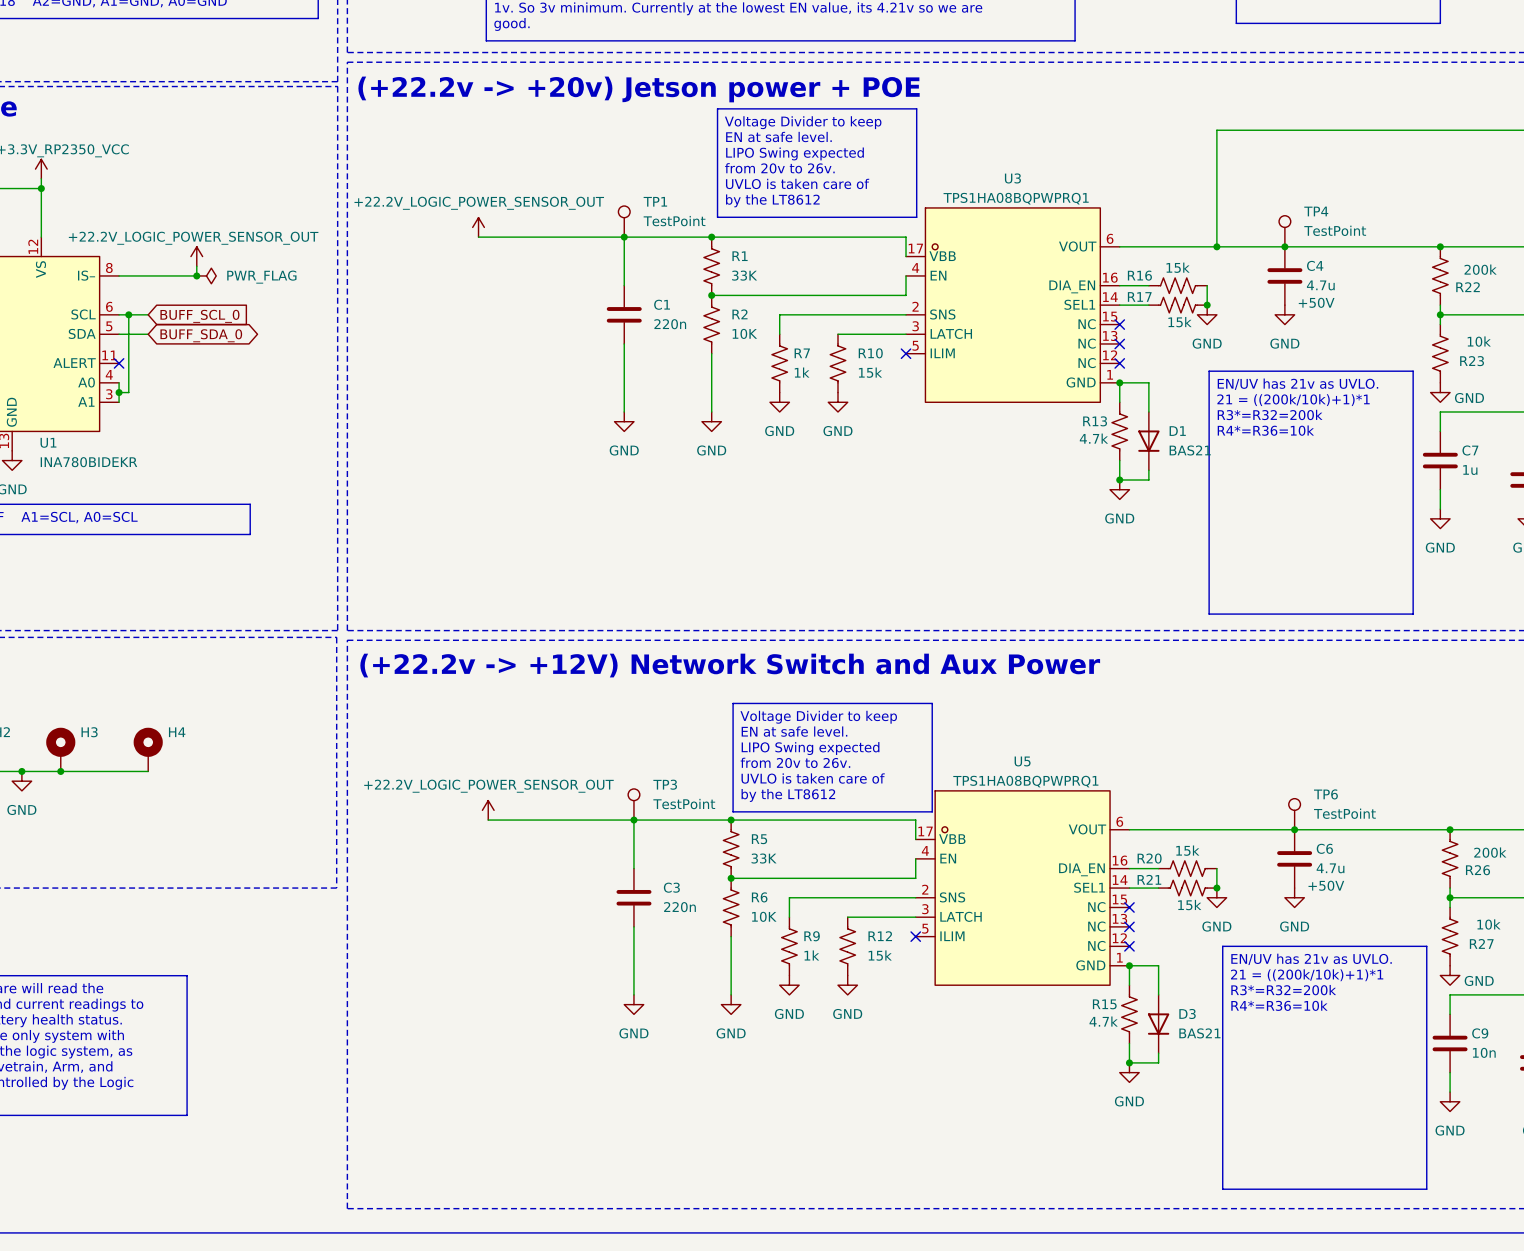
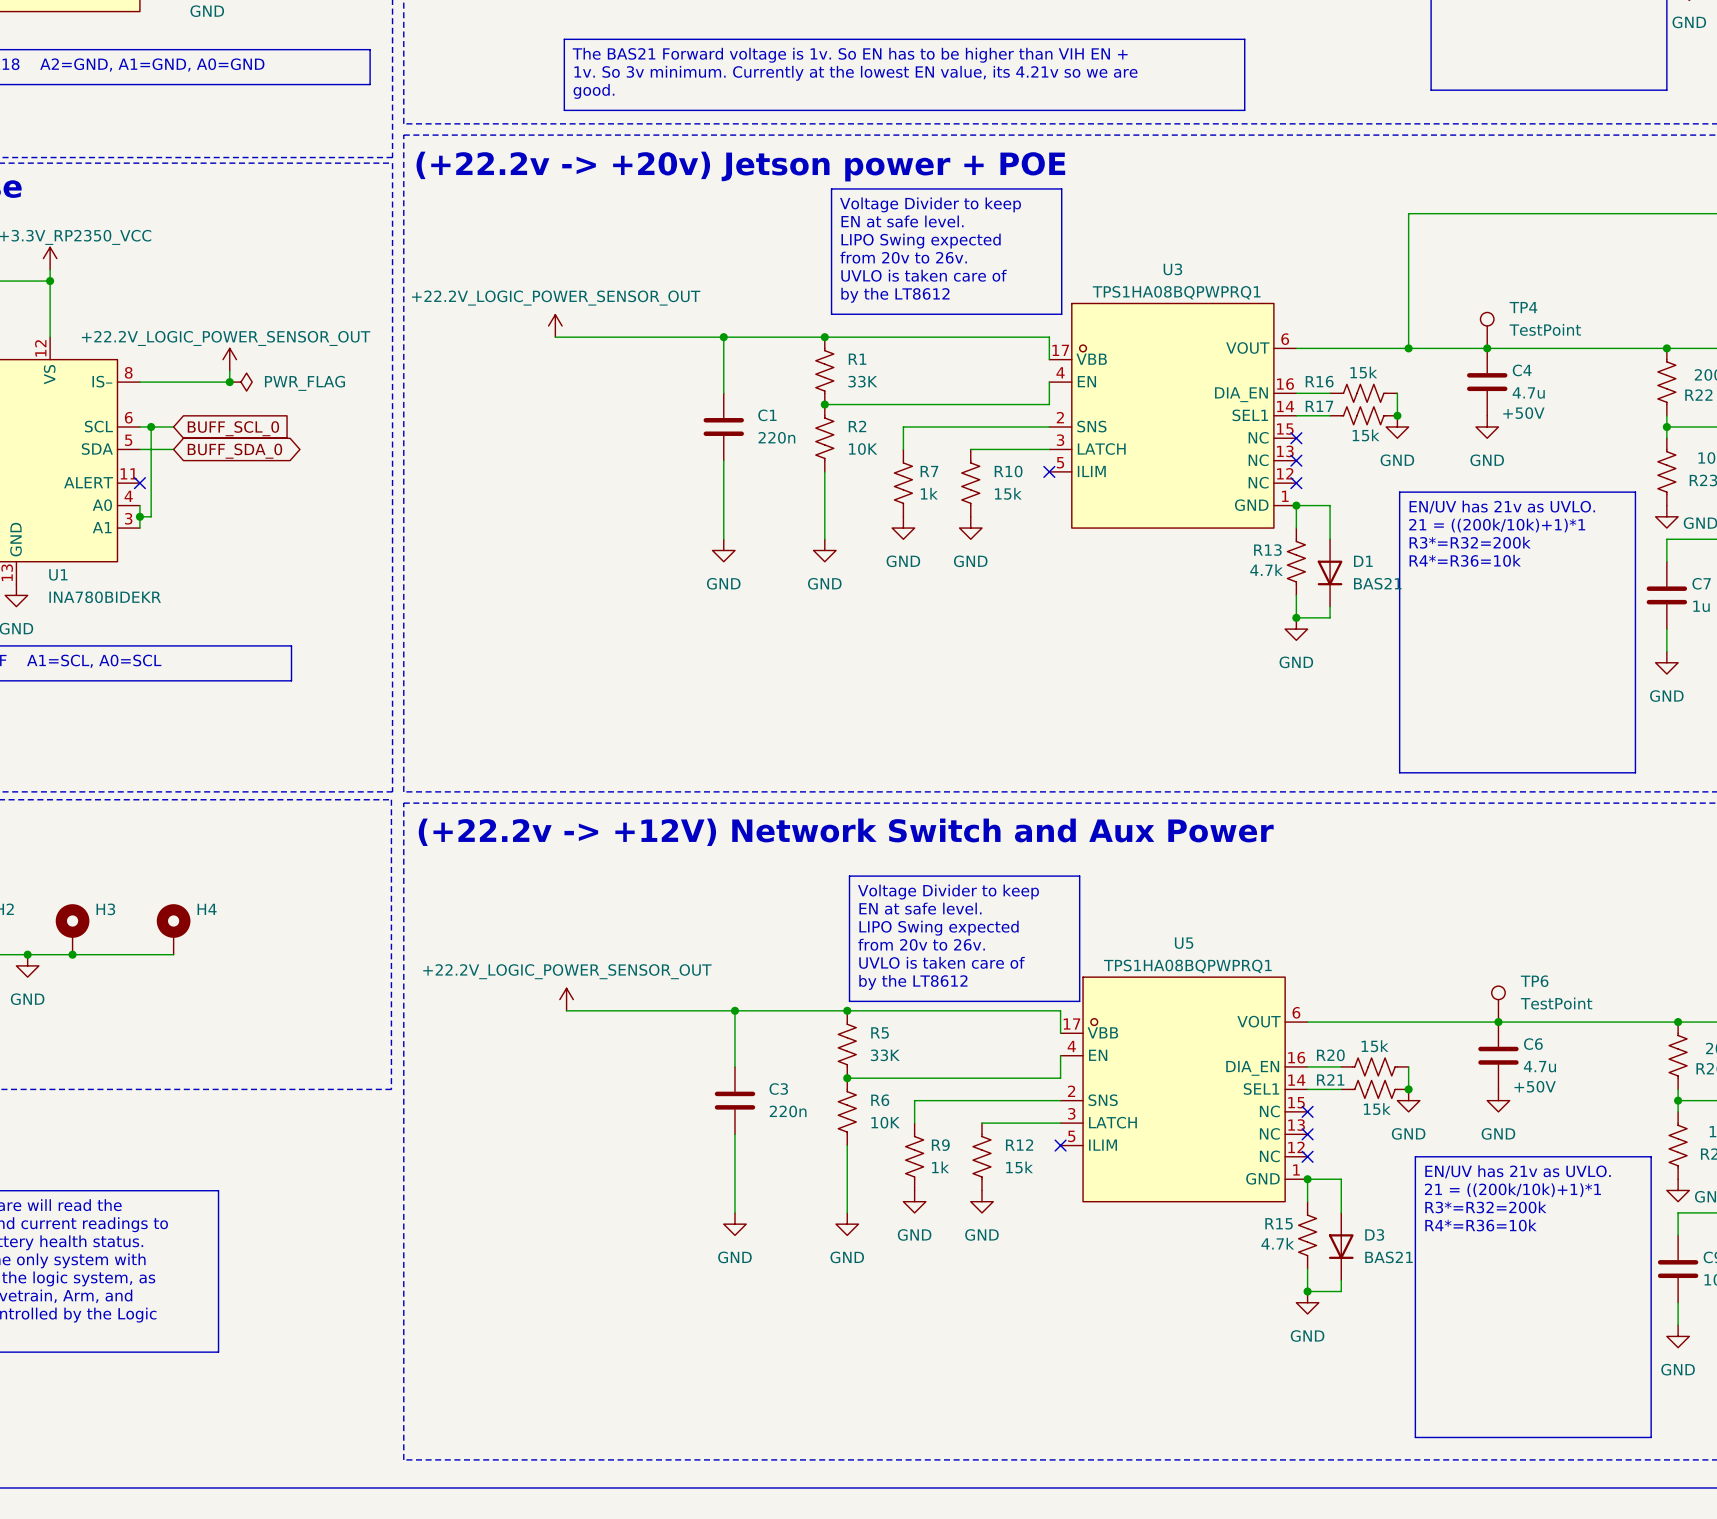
TP1: TestPoint (624, 221) -> none
TP3: TestPoint (633, 804) -> none

